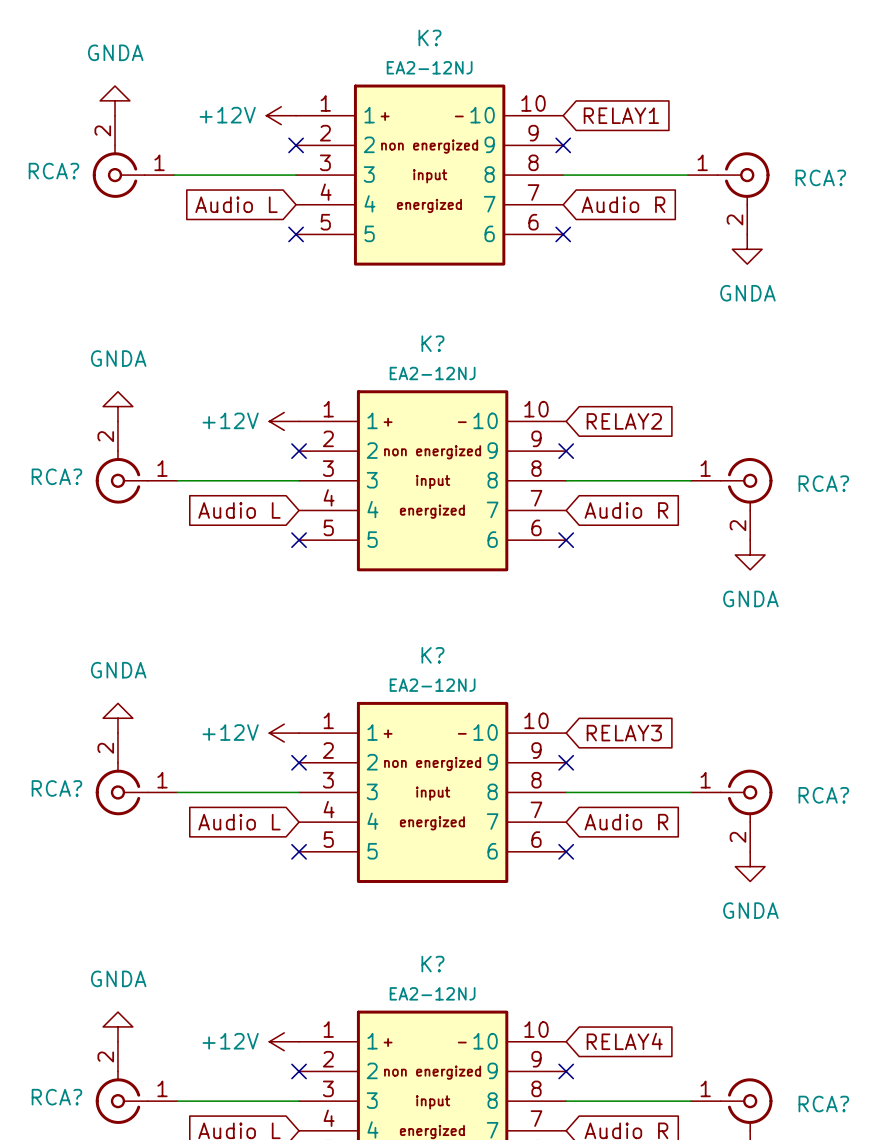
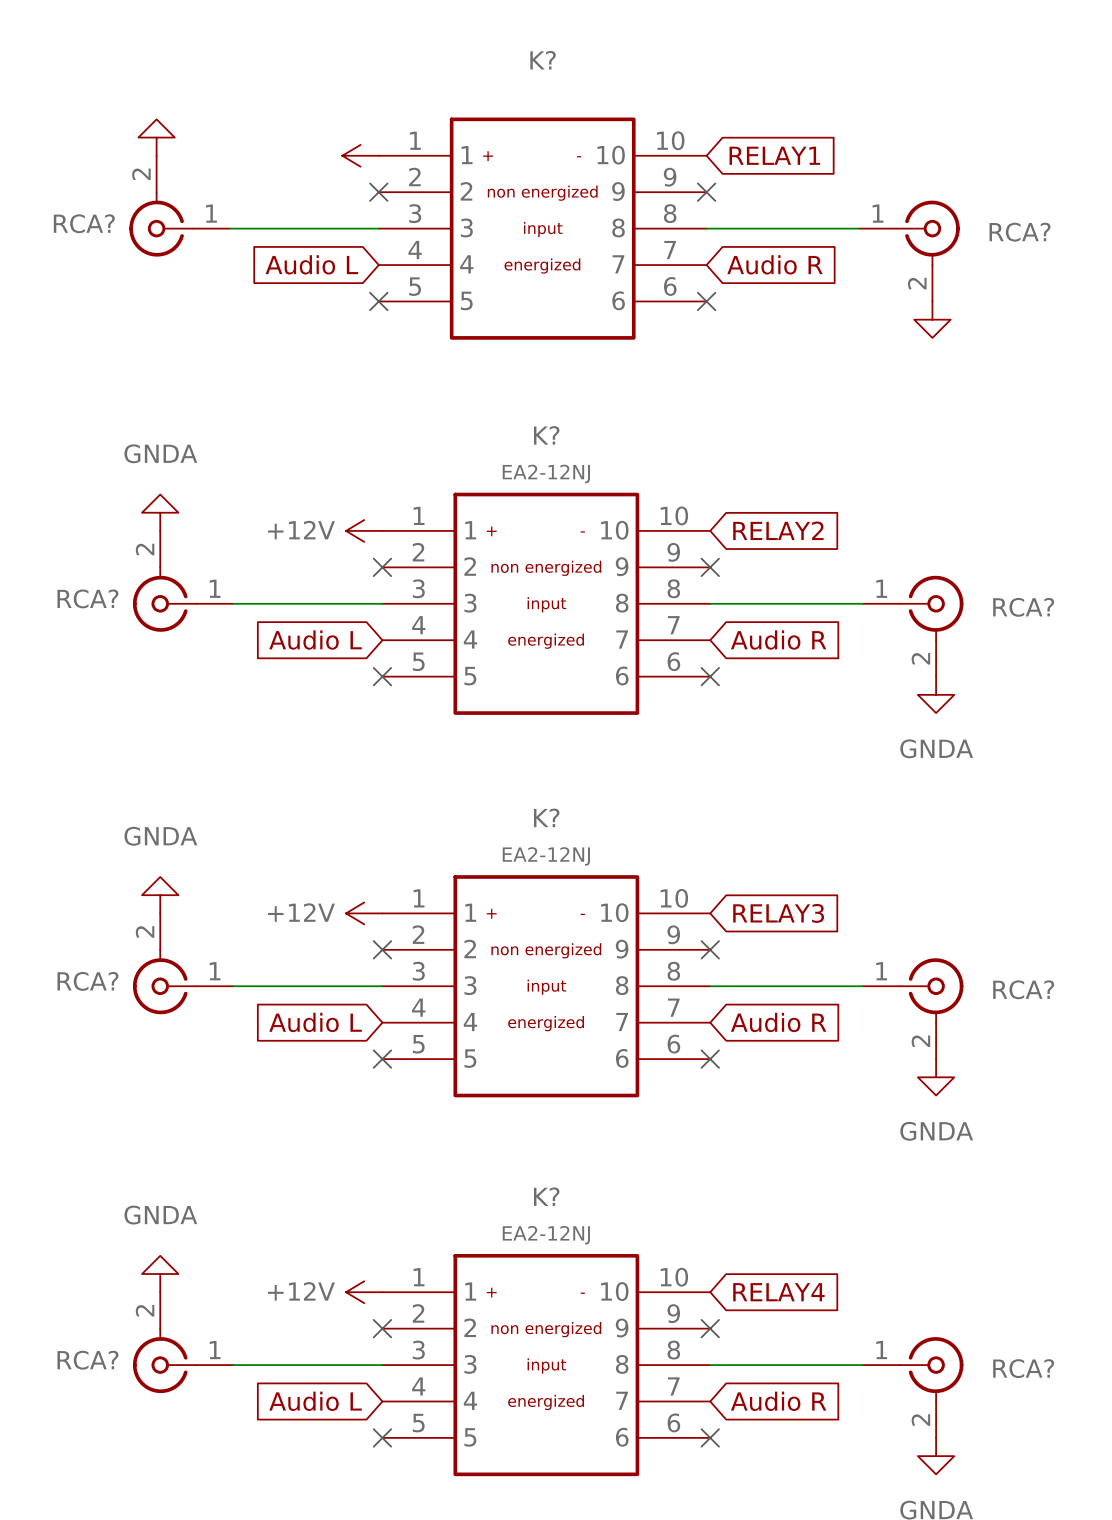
power symbol text: GNDA (115, 52) -> none
K? value: EA2-12NJ (429, 67) -> none
power symbol text: +12V (227, 115) -> none
power symbol text: GNDA (747, 293) -> none

